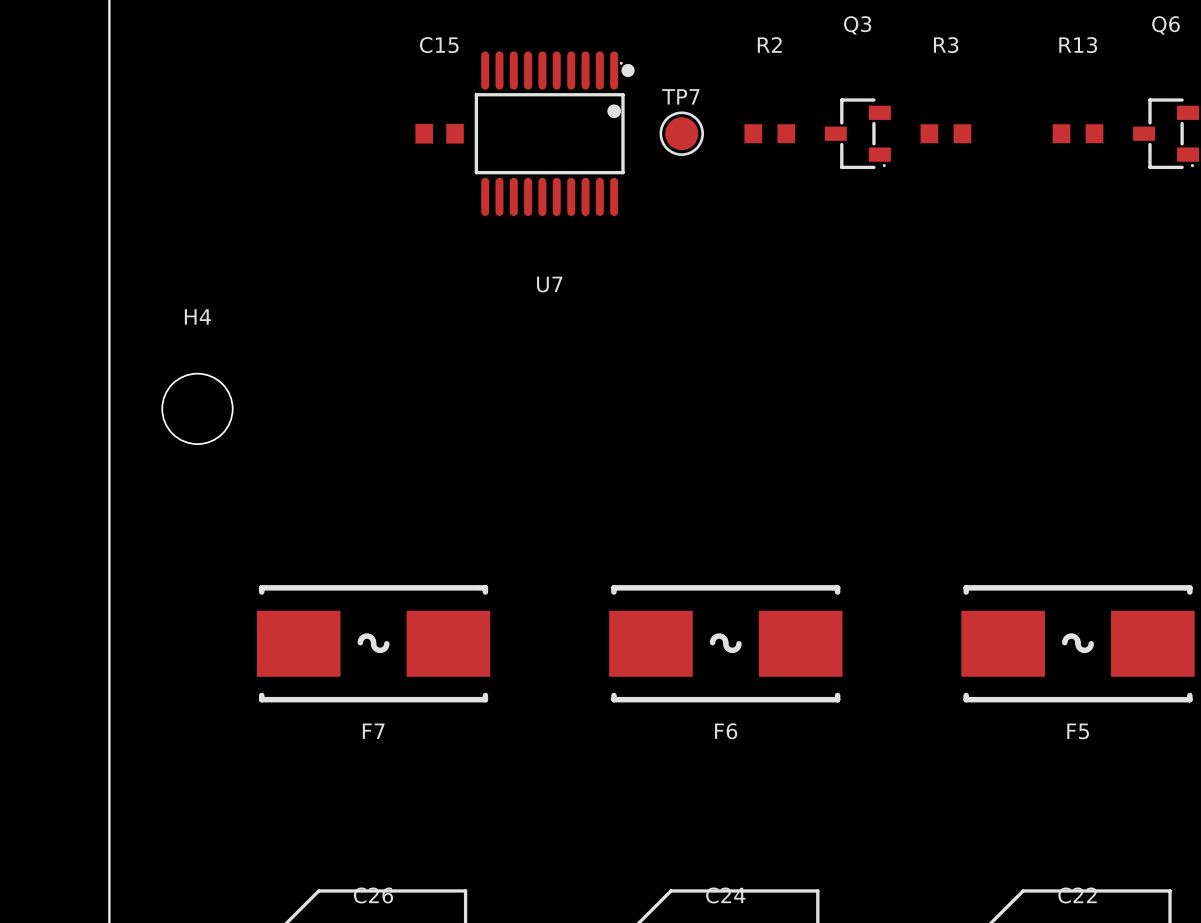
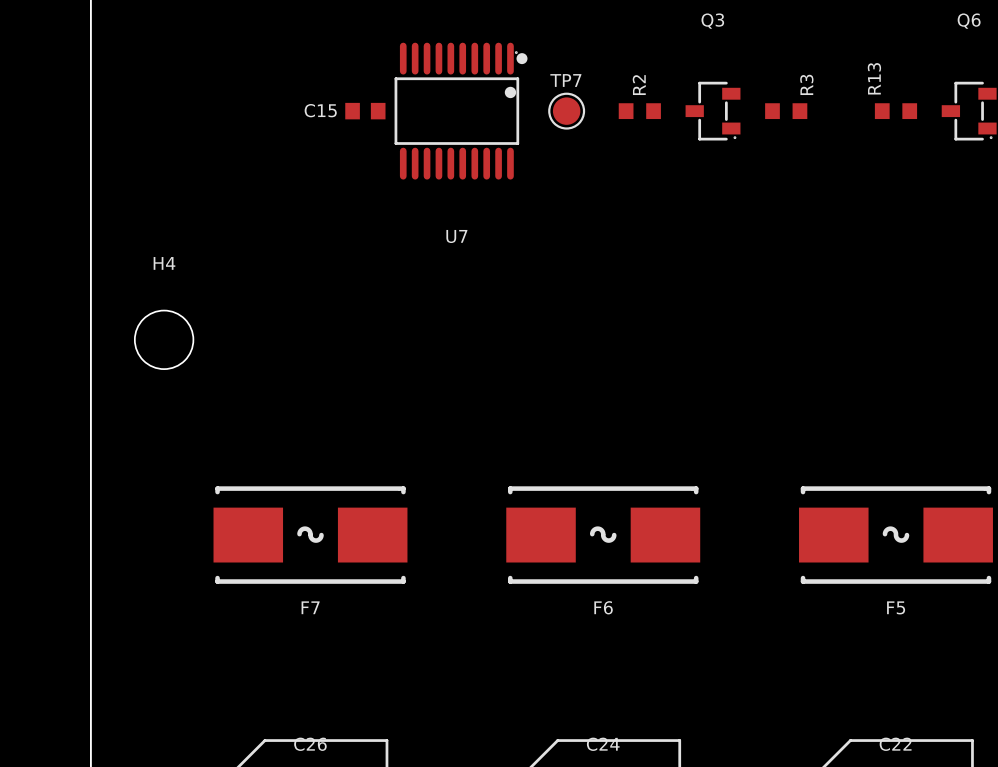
R2 name rotation: 0° (769, 44) -> 90° counterclockwise (639, 85)
R2 name position: R2 (769, 44) -> R2 (639, 85)
C15 name position: C15 (439, 45) -> C15 (320, 110)
R3 name rotation: 0° (946, 45) -> 90° counterclockwise (806, 84)
R3 name position: R3 (946, 45) -> R3 (806, 84)
R13 name rotation: 0° (1078, 45) -> 90° counterclockwise (874, 78)
R13 name position: R13 (1078, 45) -> R13 (874, 78)

